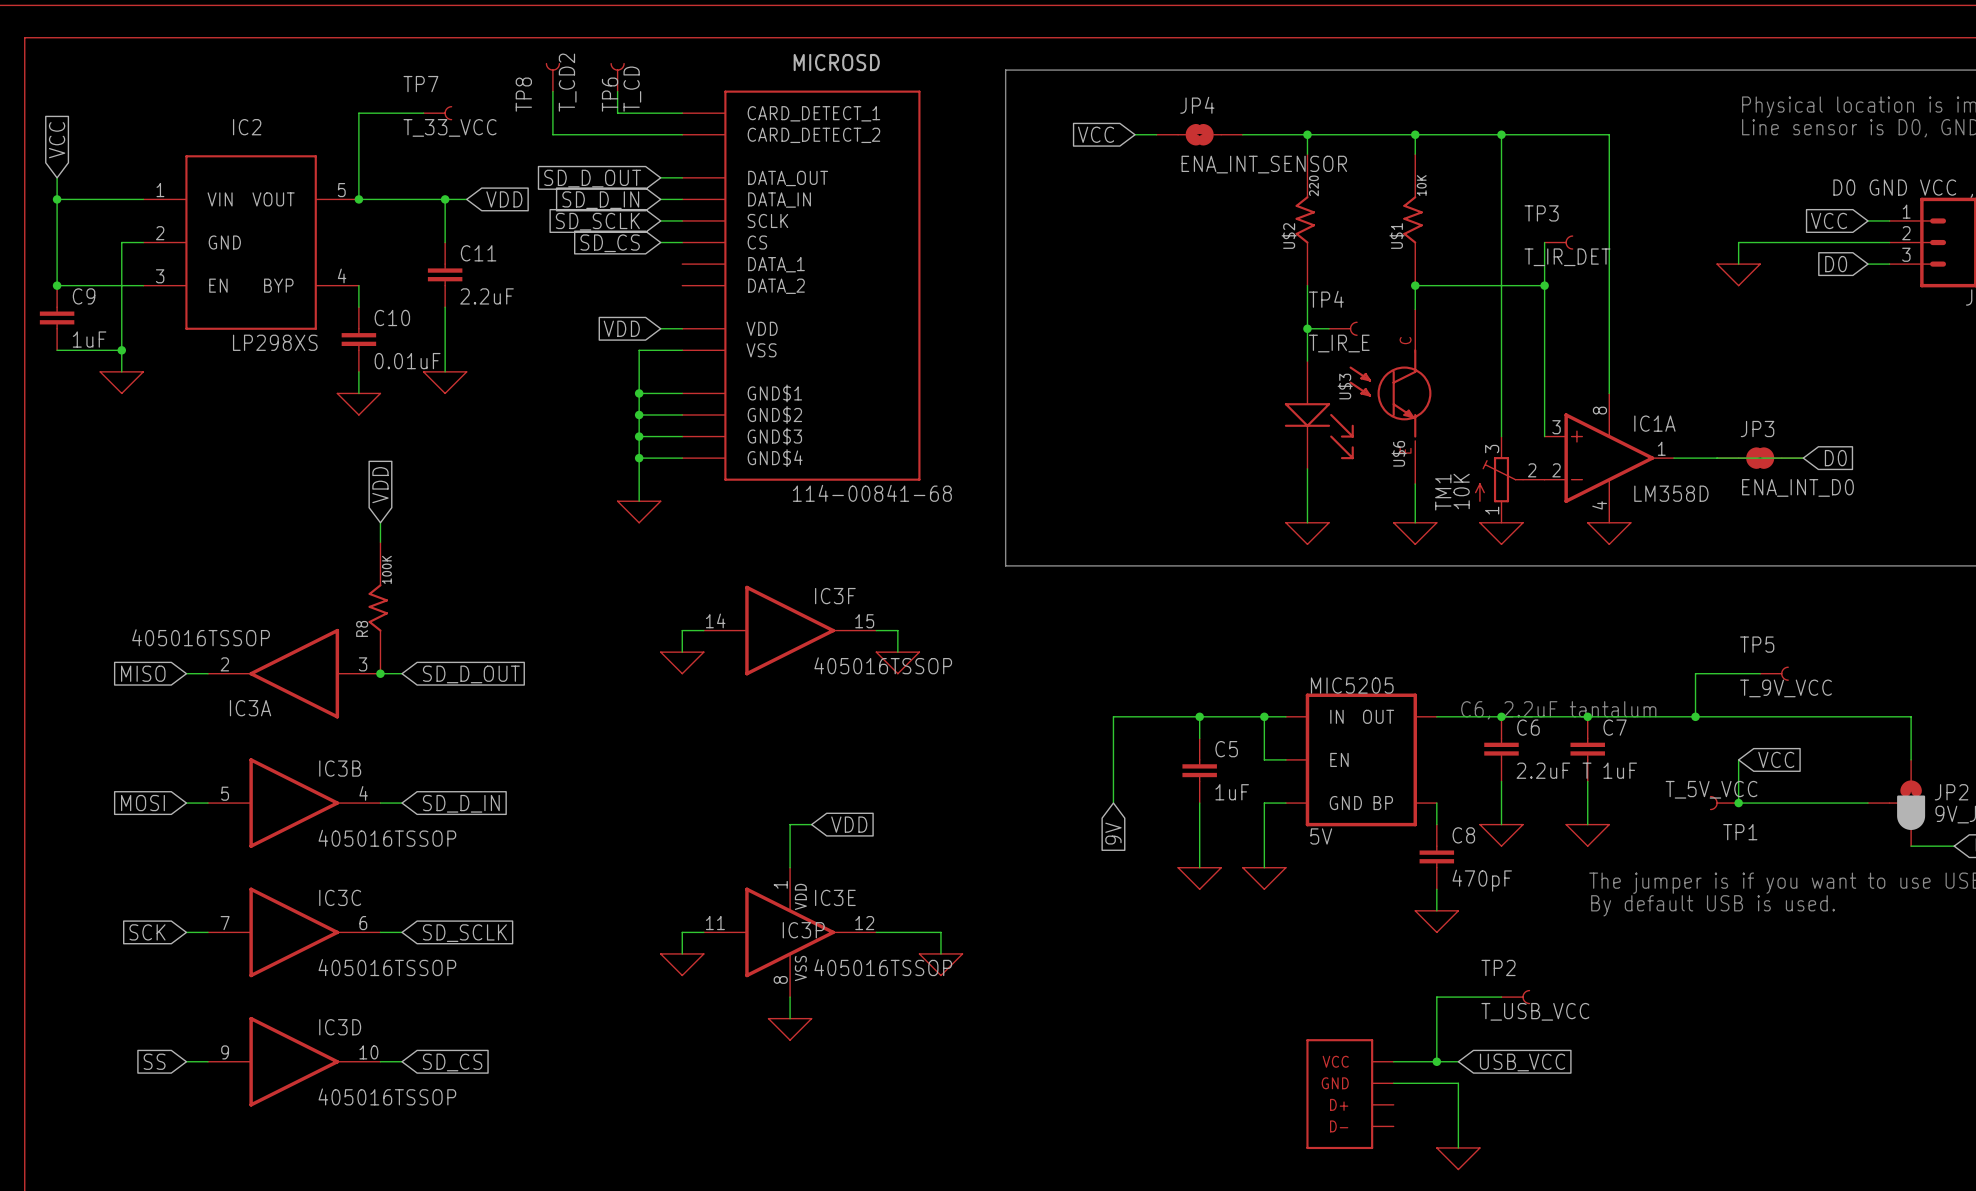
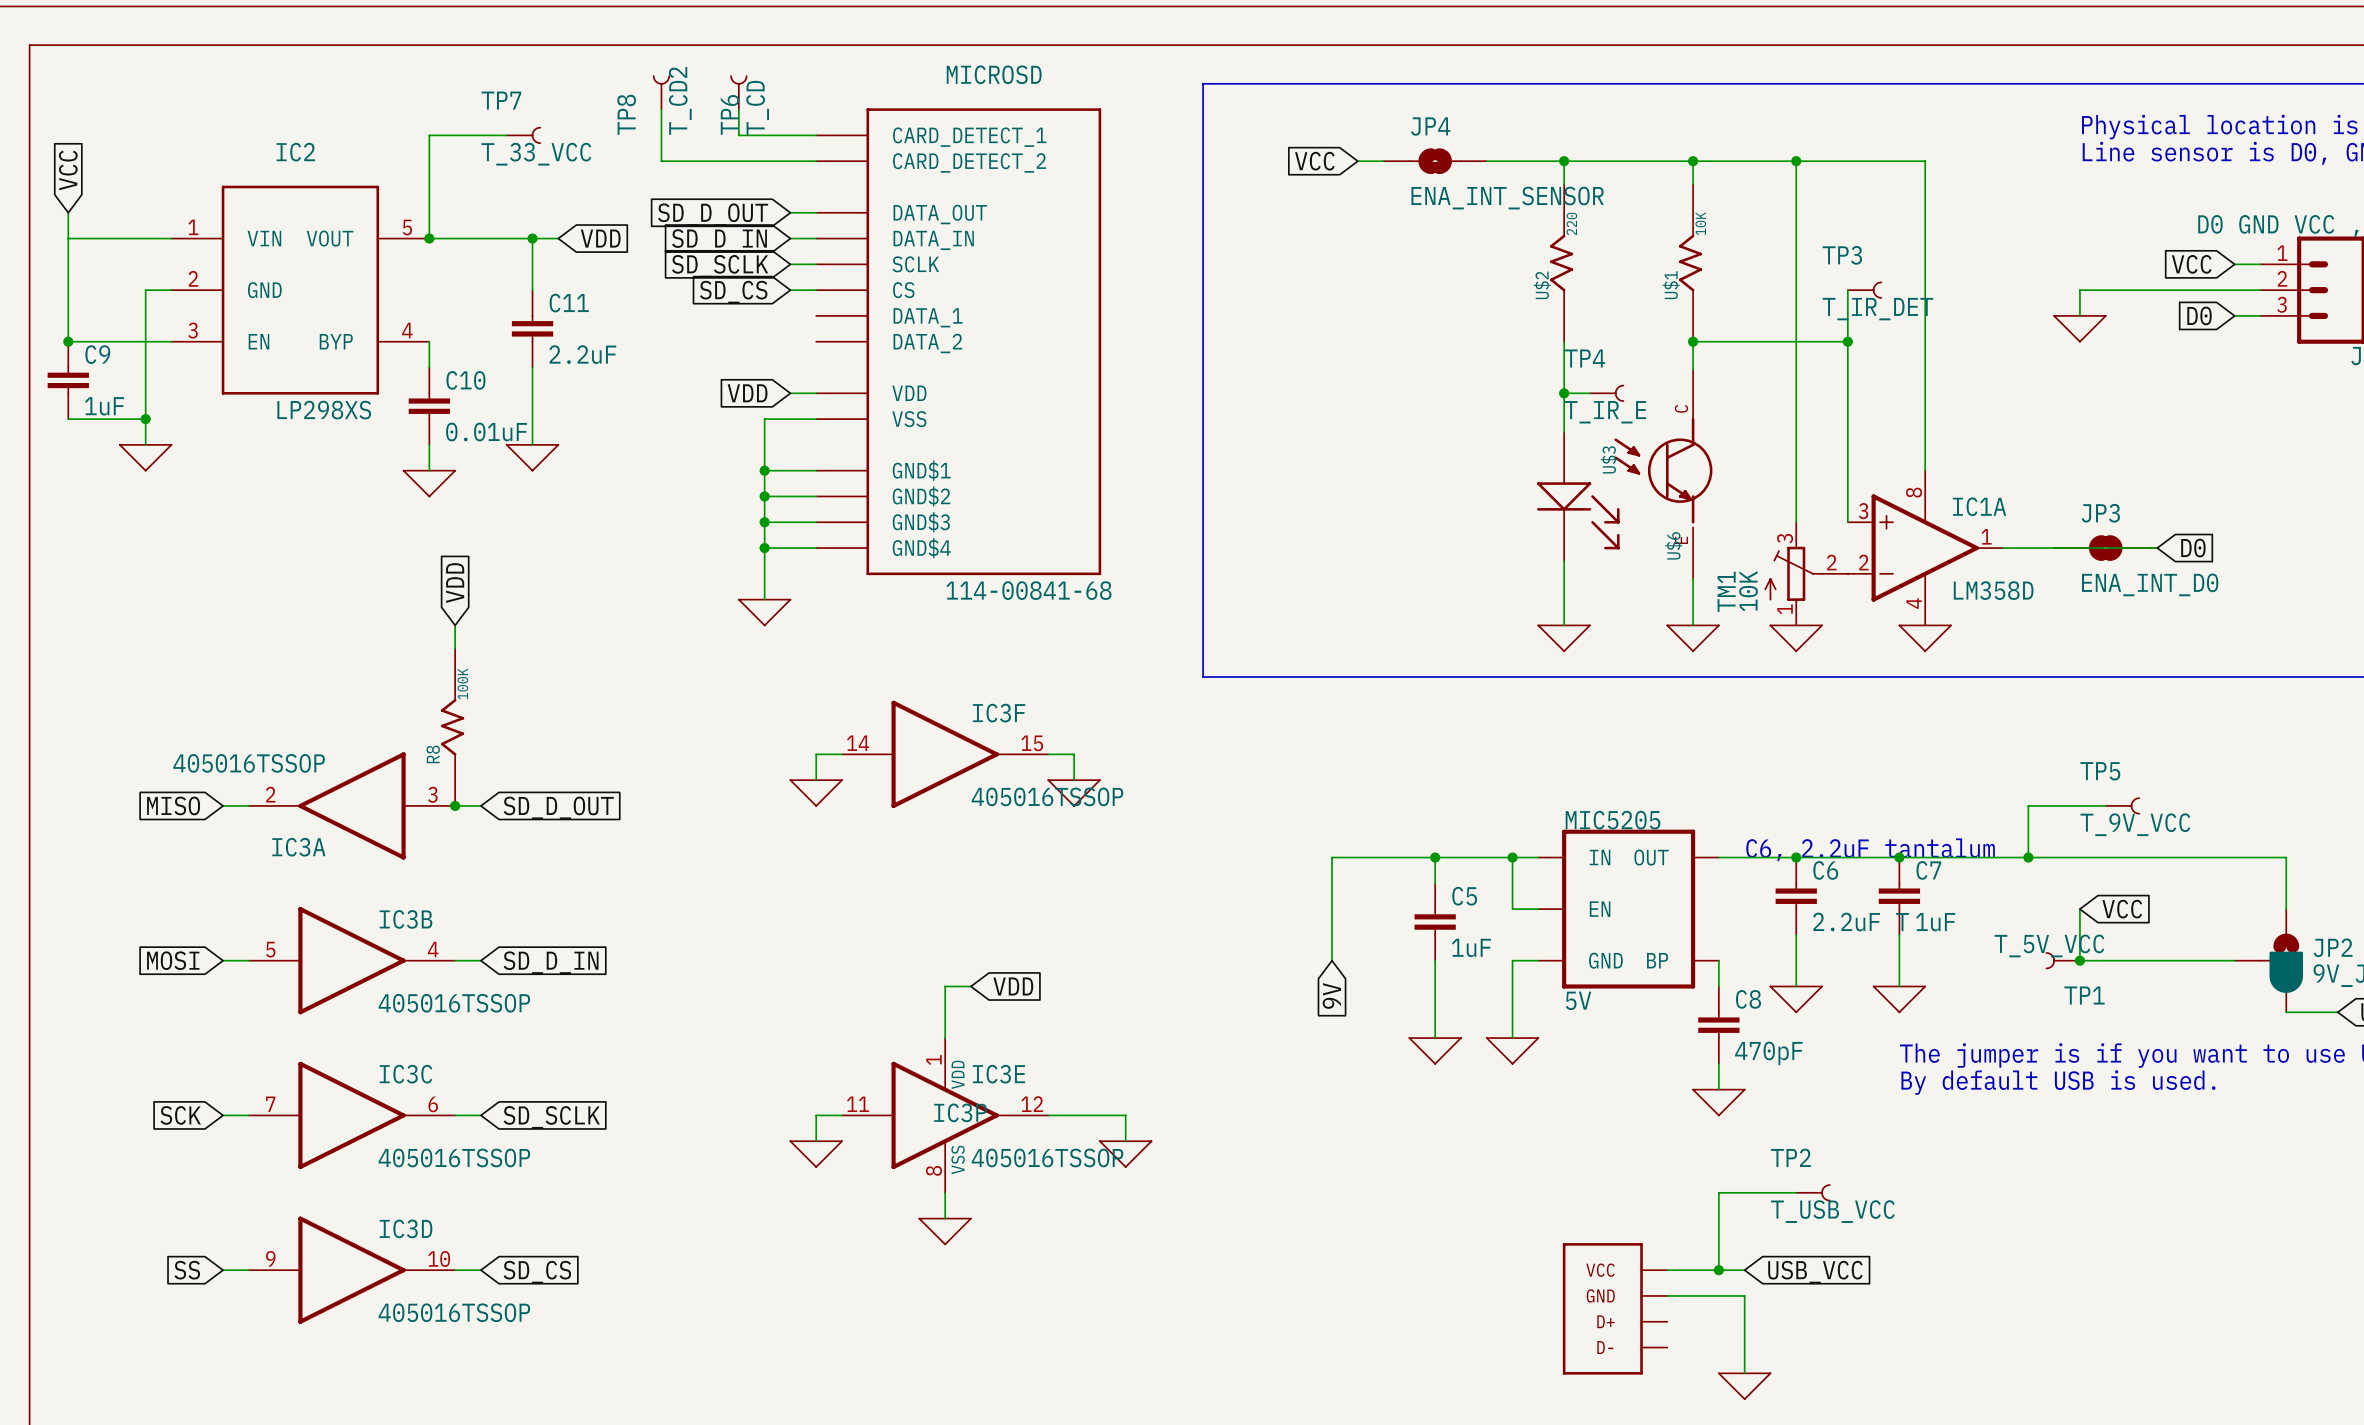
junction: (57, 199) -> none

